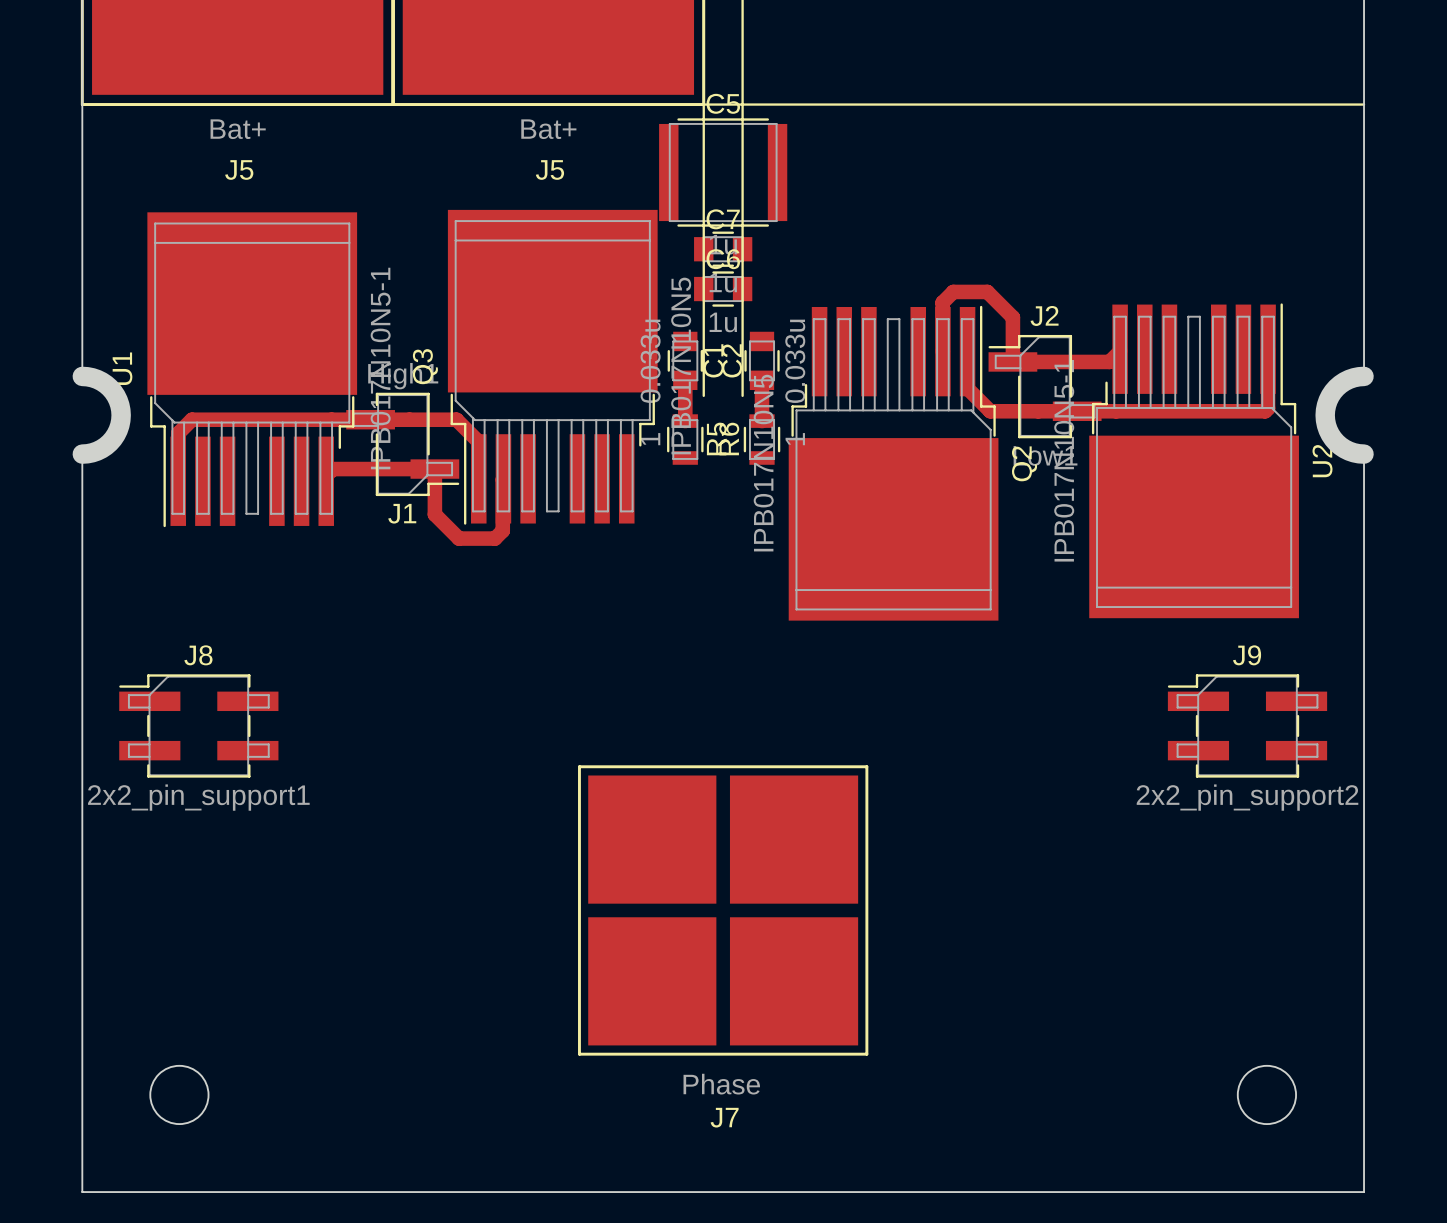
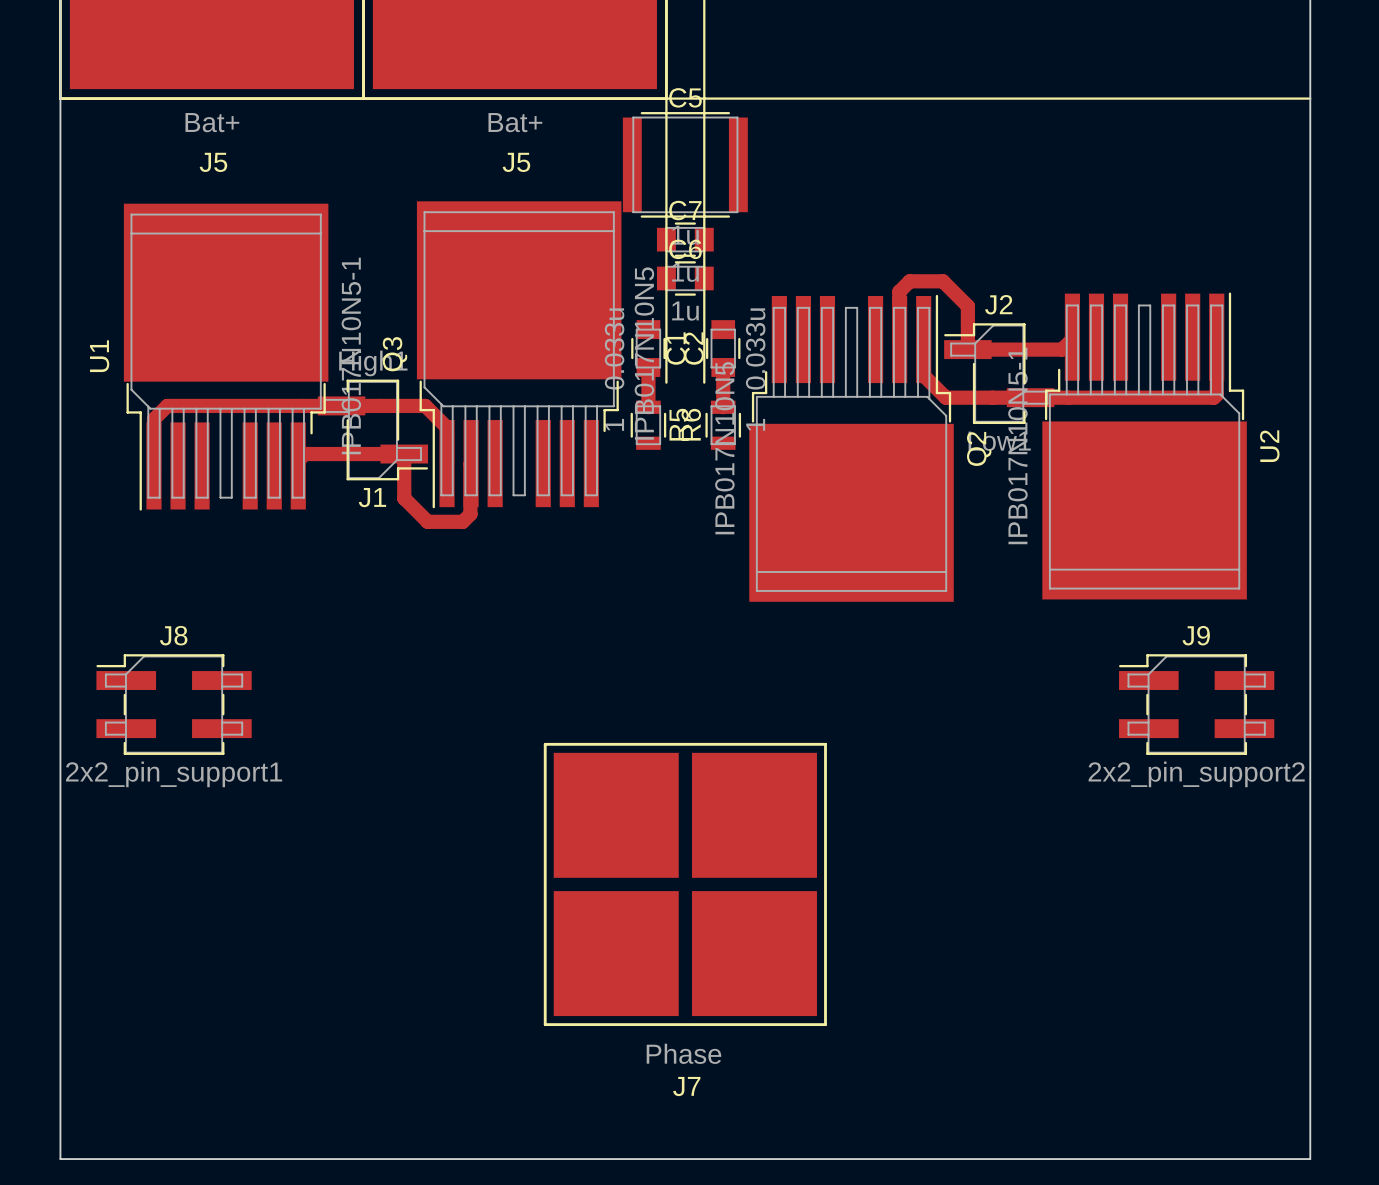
board edge: (82, 376) (97, 379) (109, 387) (118, 400) (121, 415) (118, 430) (109, 442) (97, 451) (82, 454) -> (60, 363) (60, 439)
board edge: (1364, 376) (1349, 379) (1336, 387) (1328, 400) (1325, 415) (1328, 430) (1336, 442) (1349, 451) (1364, 454) -> (1310, 363) (1310, 439)
round board edge: [149, 1065, 210, 1125] -> none
round board edge: [1237, 1065, 1297, 1125] -> none

